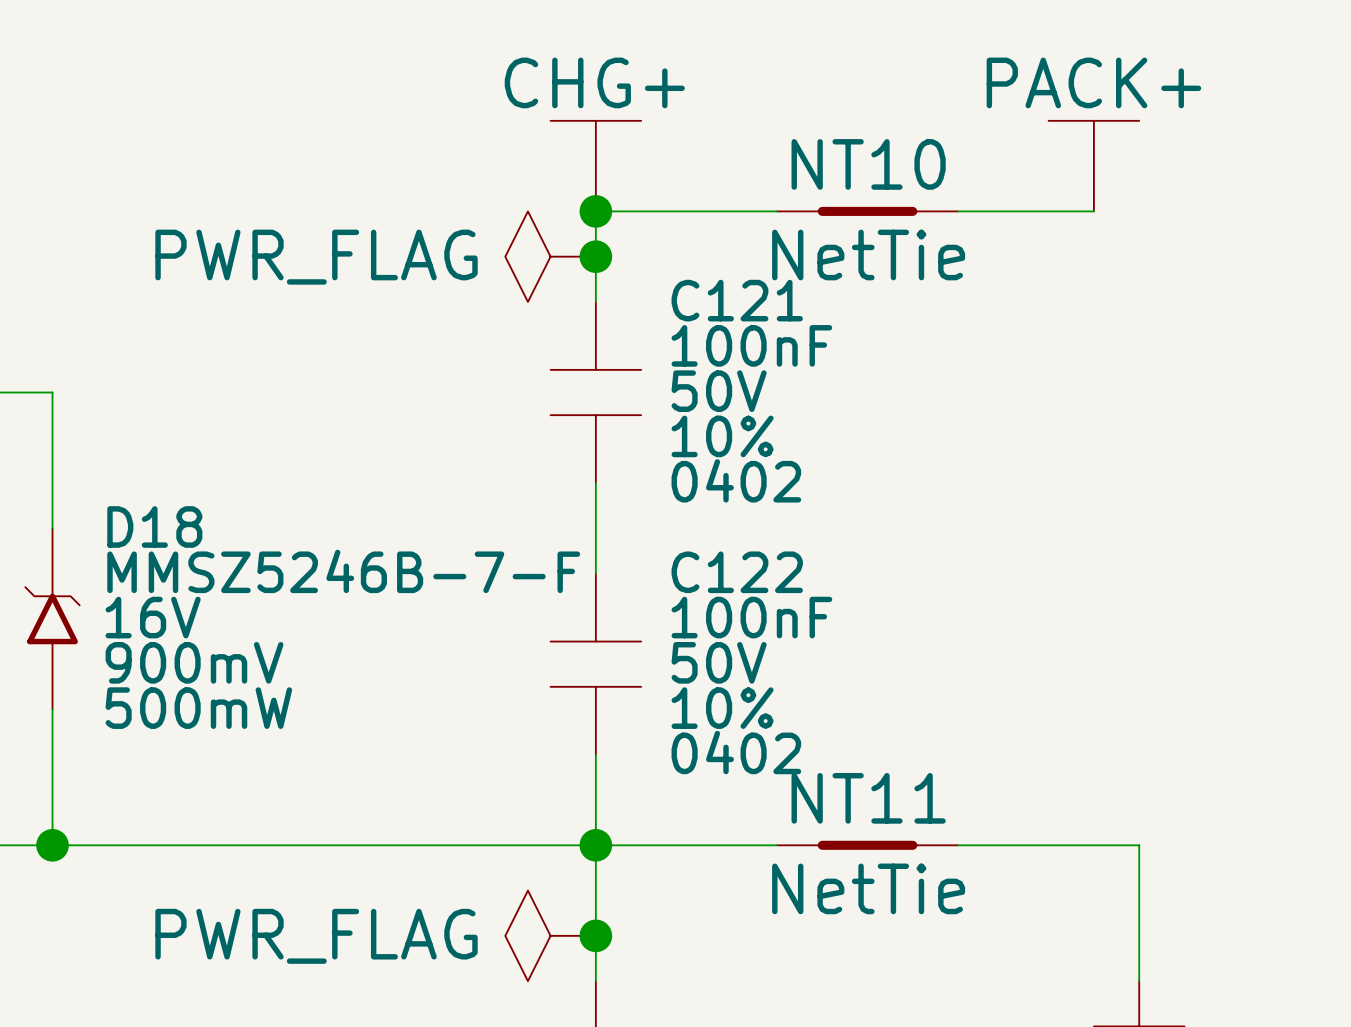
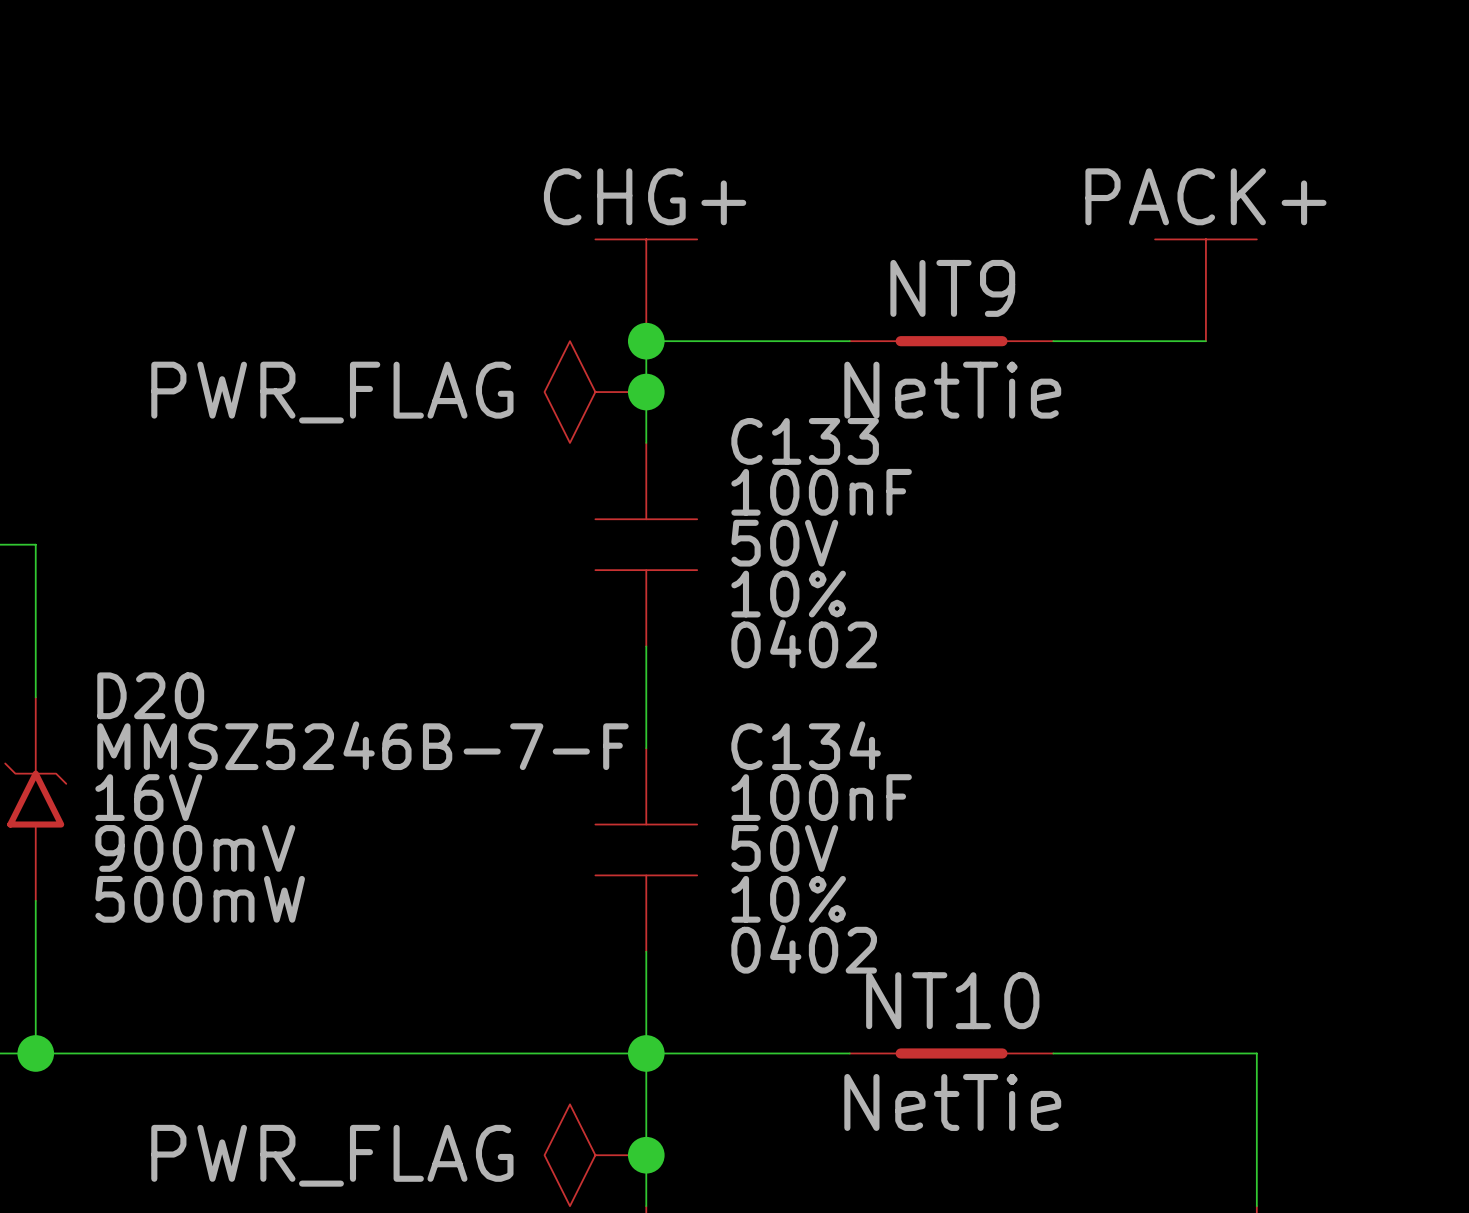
NT10 name: NT10 (868, 164) -> NT9 (952, 288)
C121 name: C121 (737, 300) -> C133 (805, 441)
D18 name: D18 (154, 527) -> D20 (150, 695)
C122 name: C122 (737, 572) -> C134 (806, 745)
NT11 name: NT11 (868, 798) -> NT10 (952, 1000)

